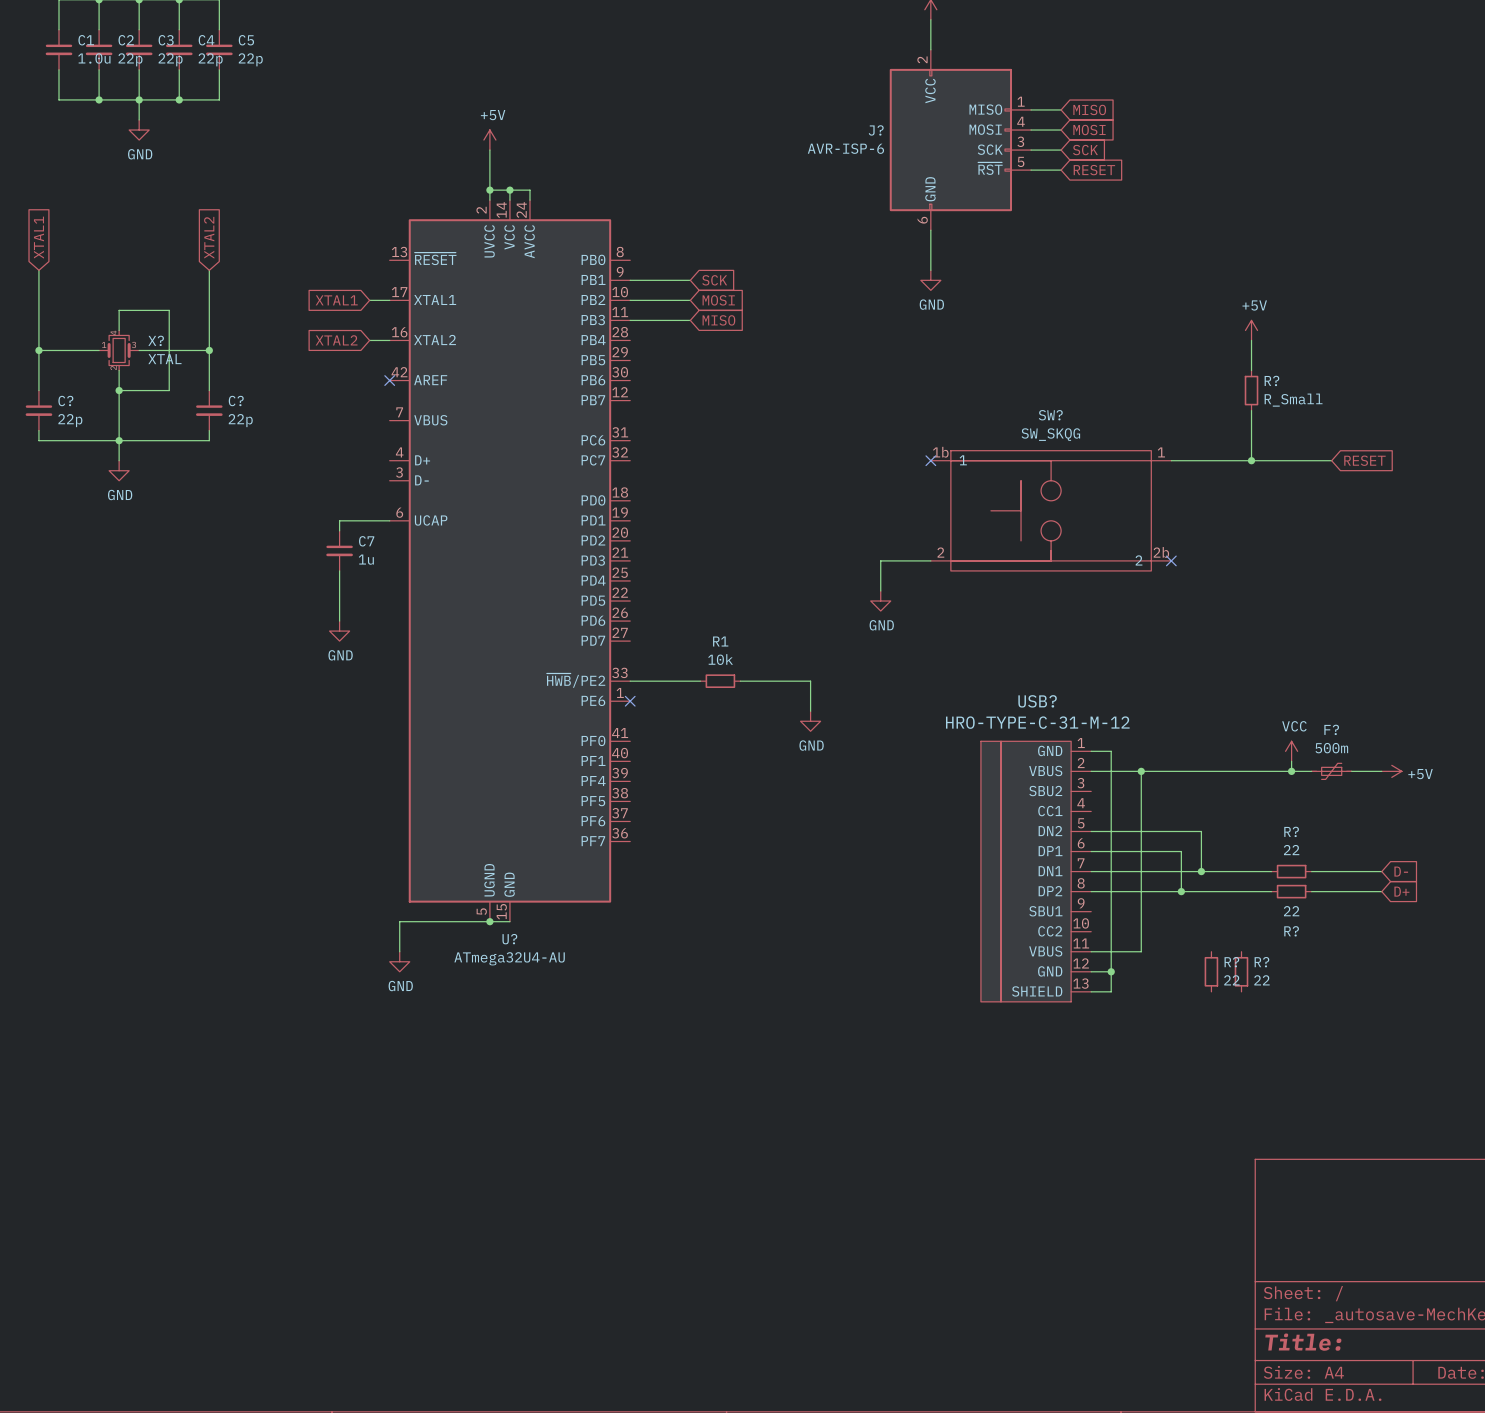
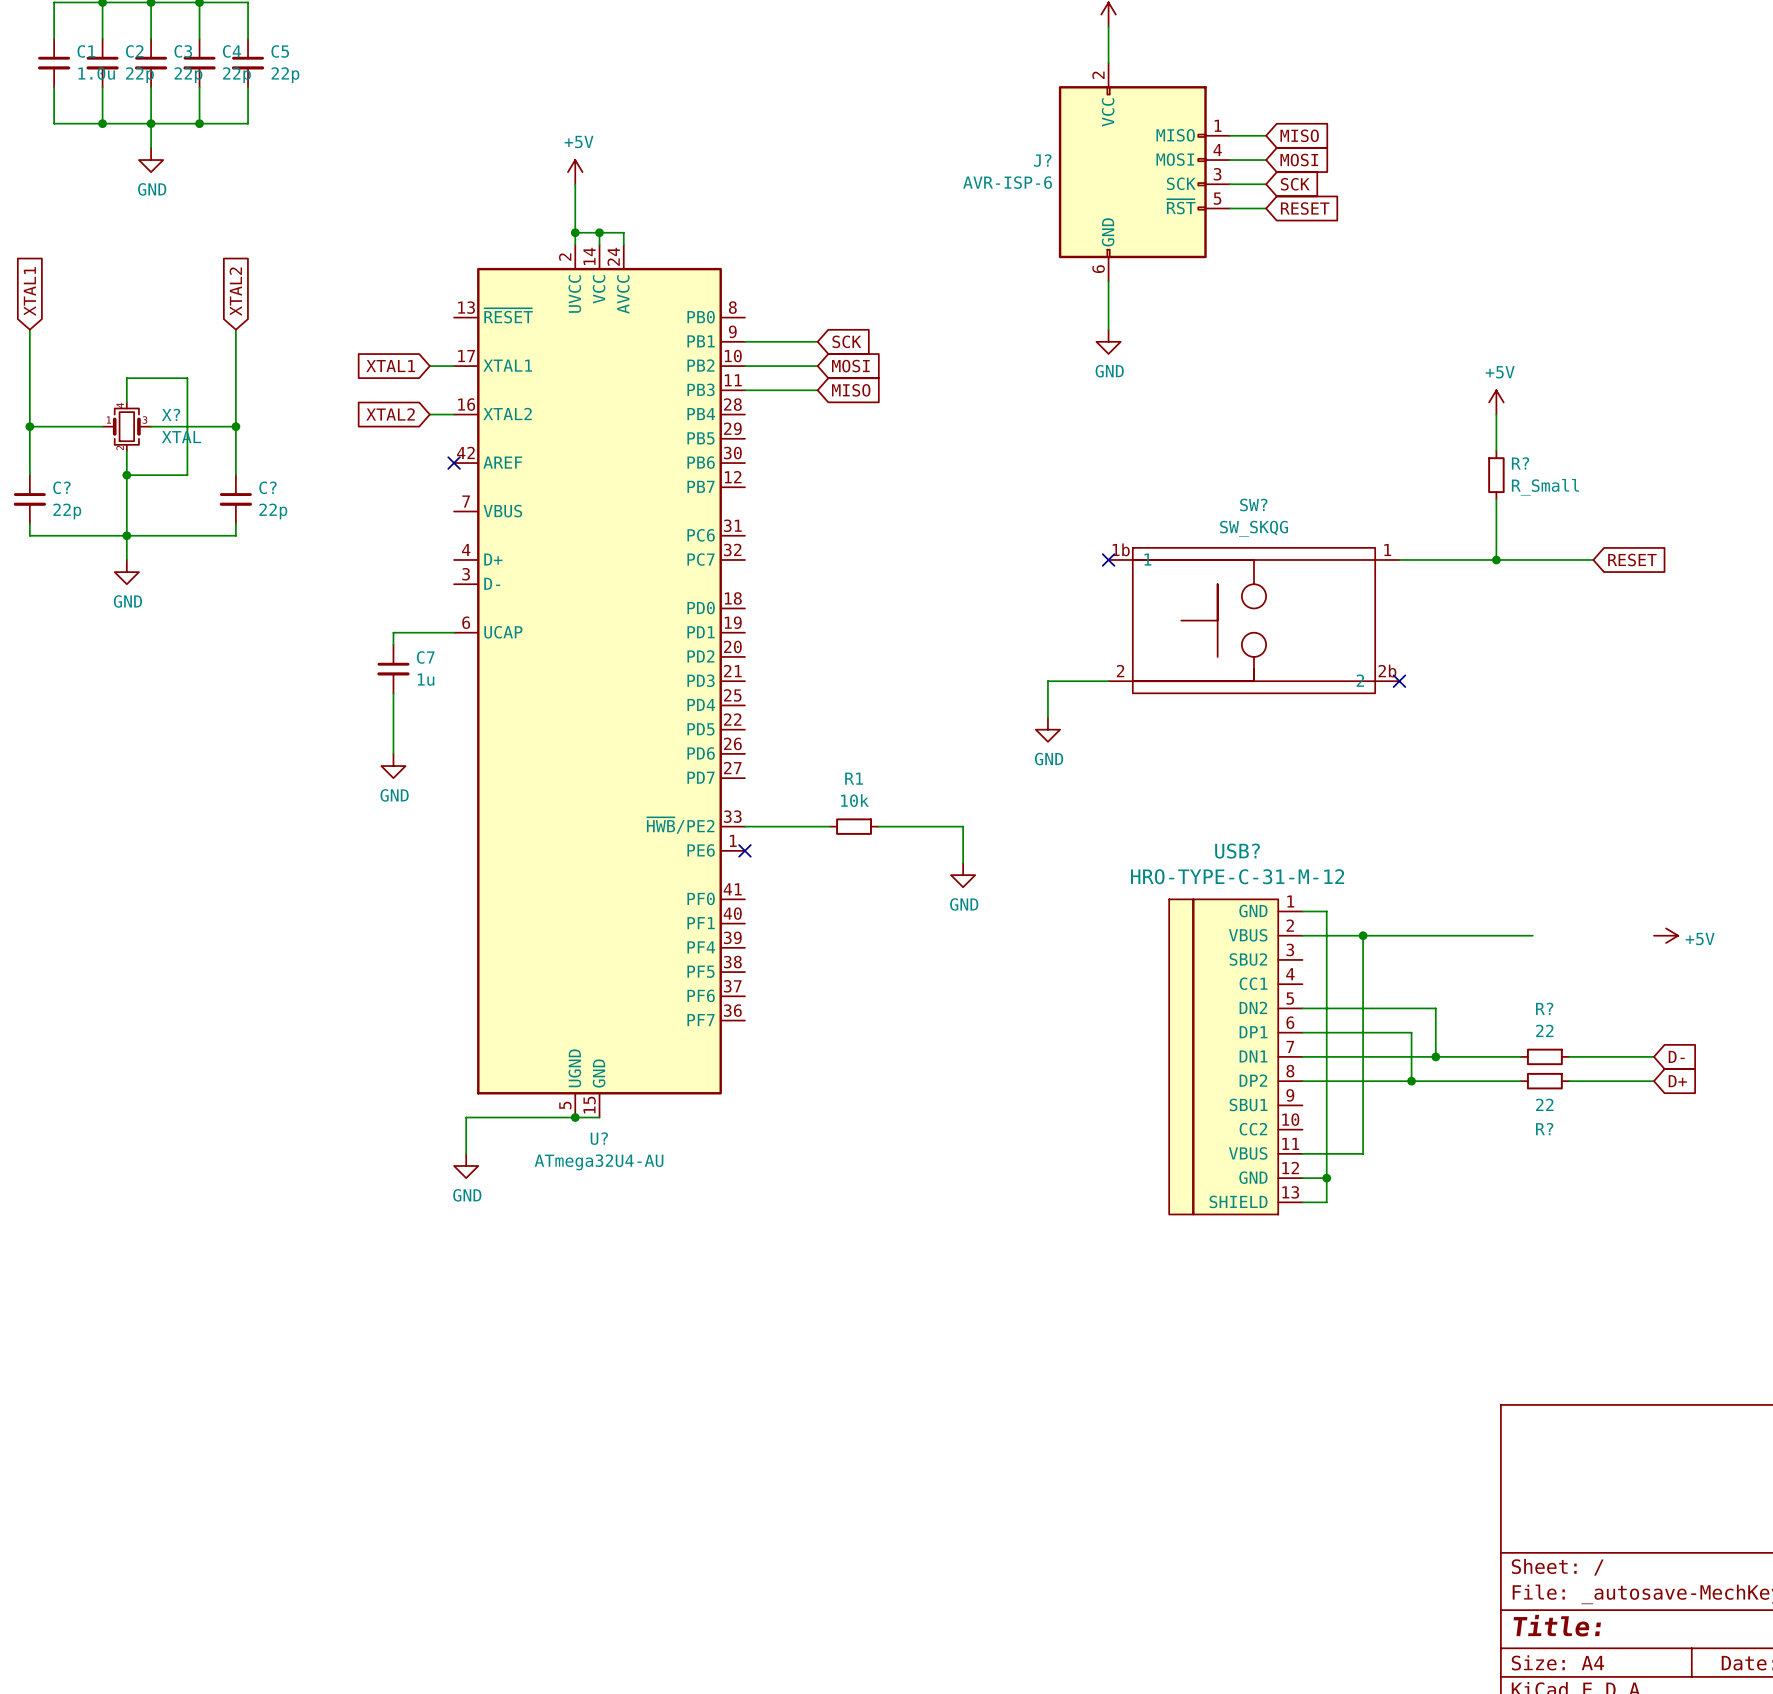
power symbol: VCC (1291, 751) -> none
wire: (1291, 761) (1291, 771) -> none
wire: (1281, 771) (1311, 771) -> none
junction: (1291, 771) -> none
F?: 500m (1331, 771) -> none
wire: (1351, 771) (1381, 771) -> none
R?: 22 (1211, 971) -> none
R?: 22 (1241, 971) -> none

